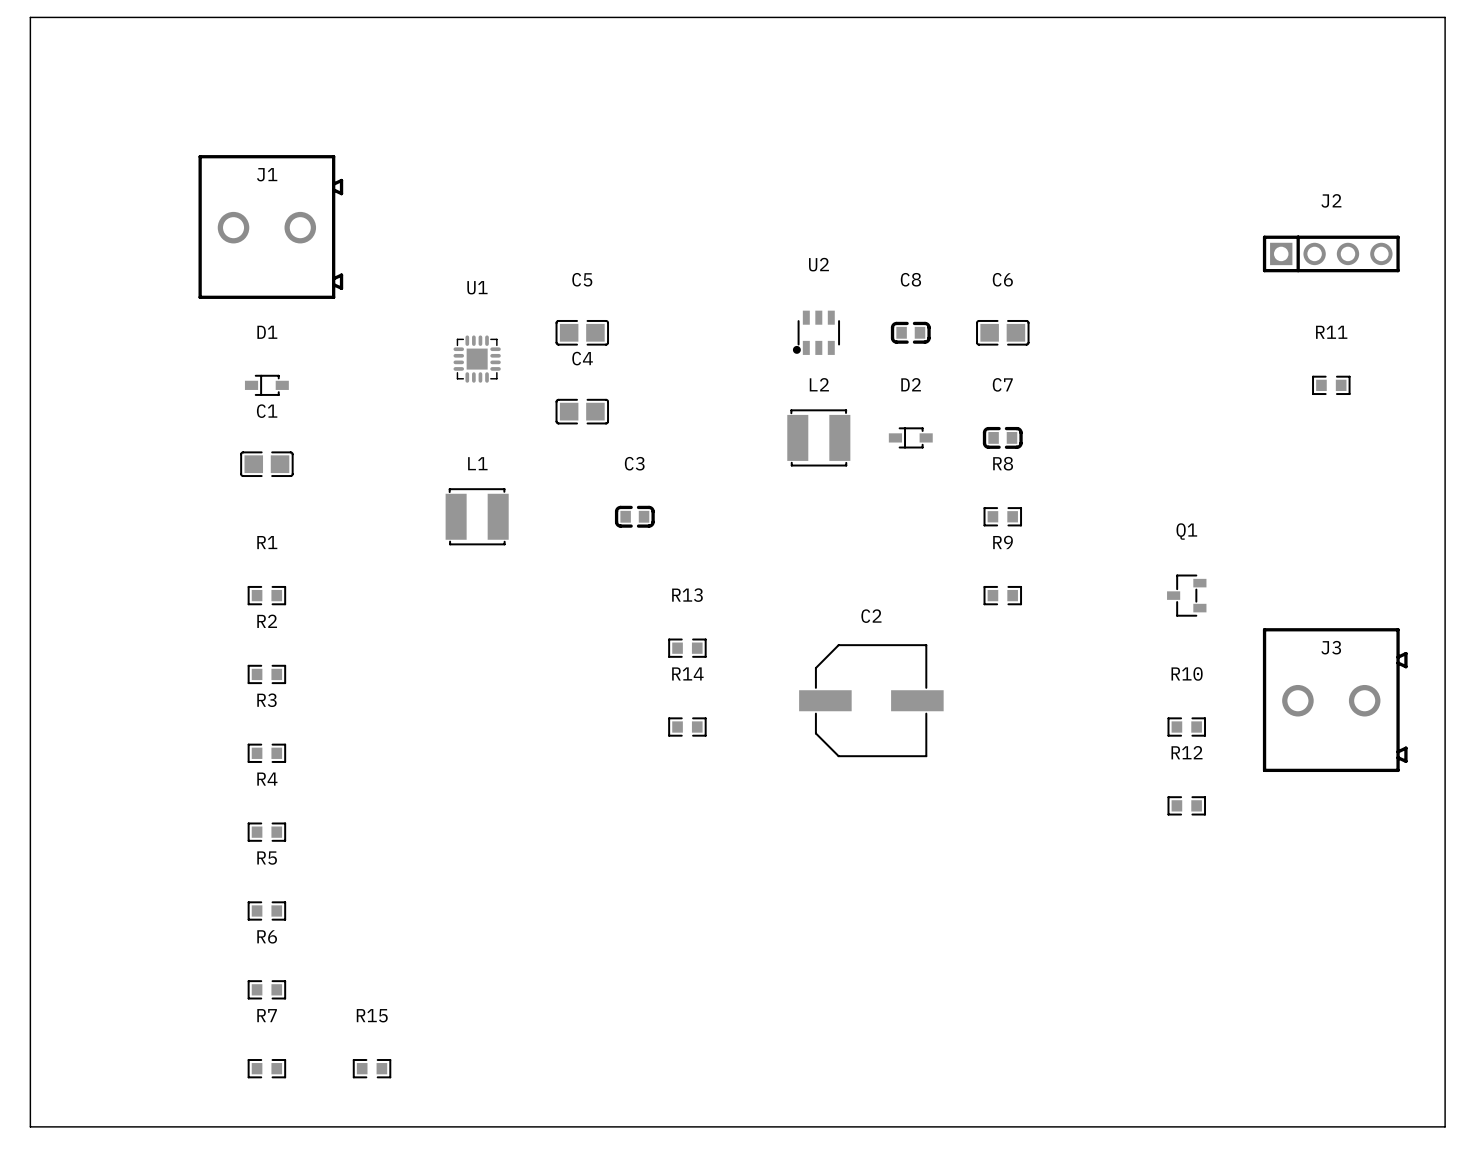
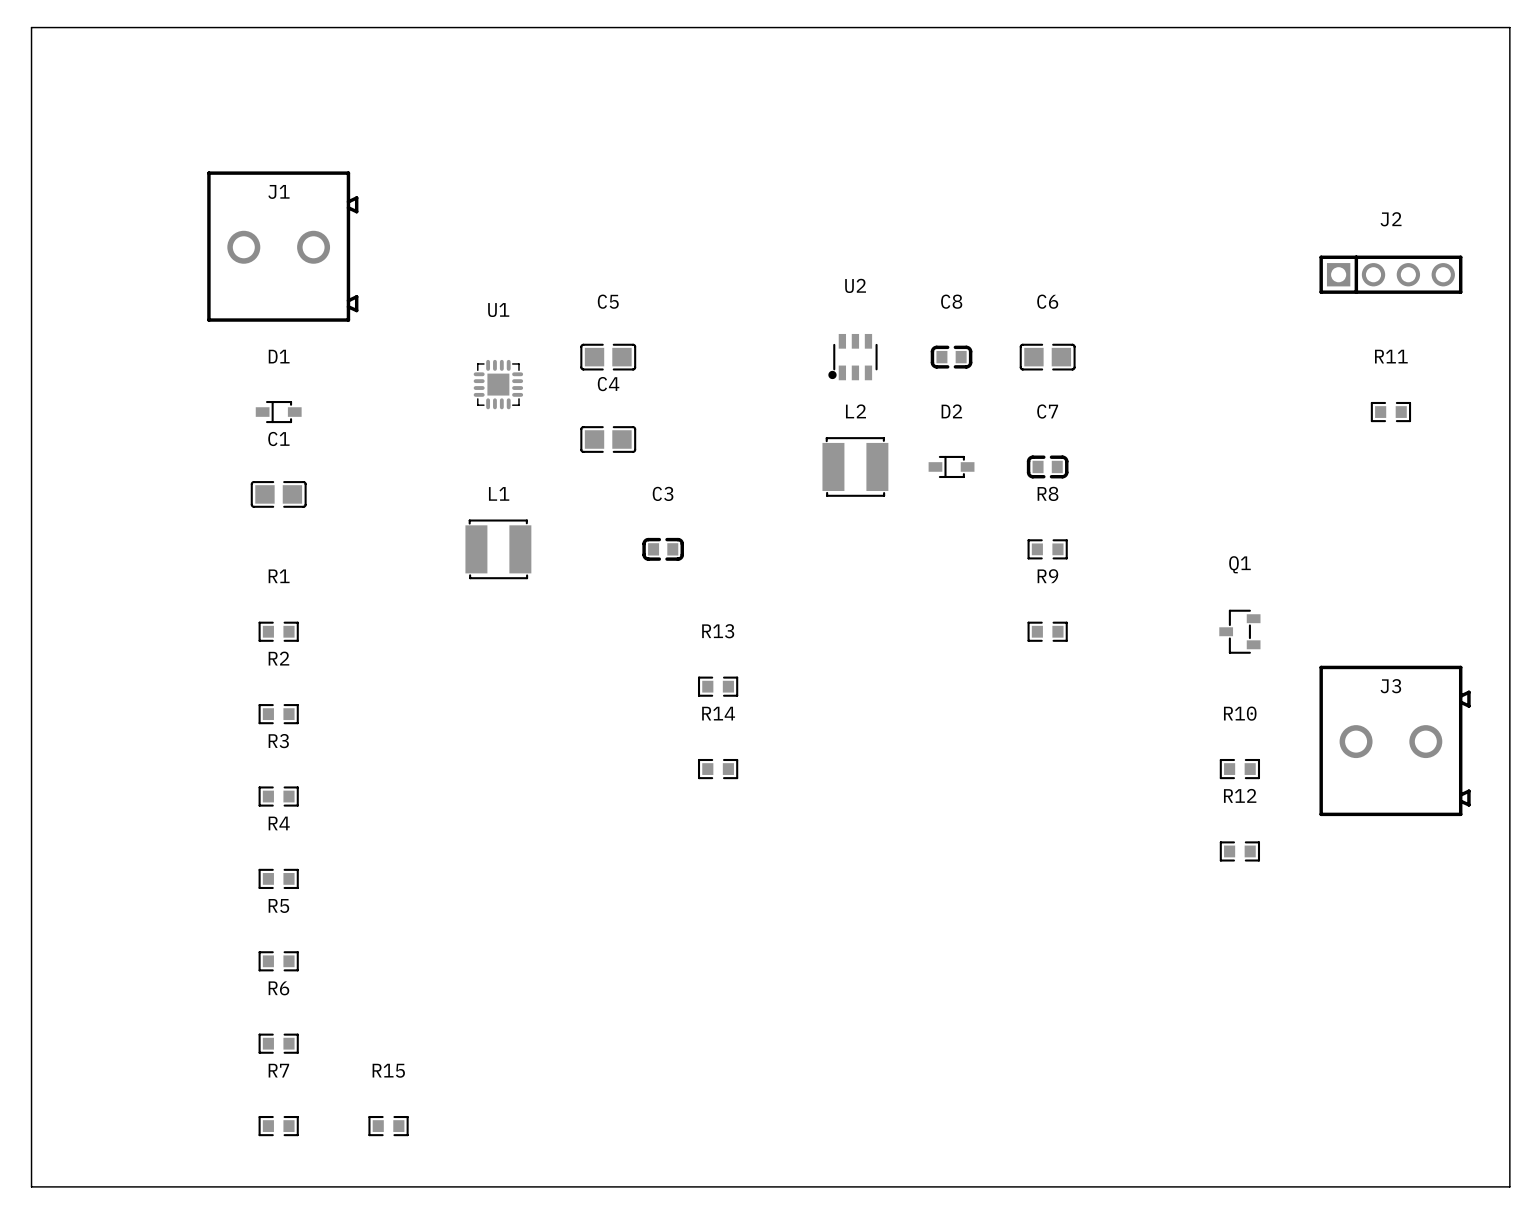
C2: (871, 700) -> none

